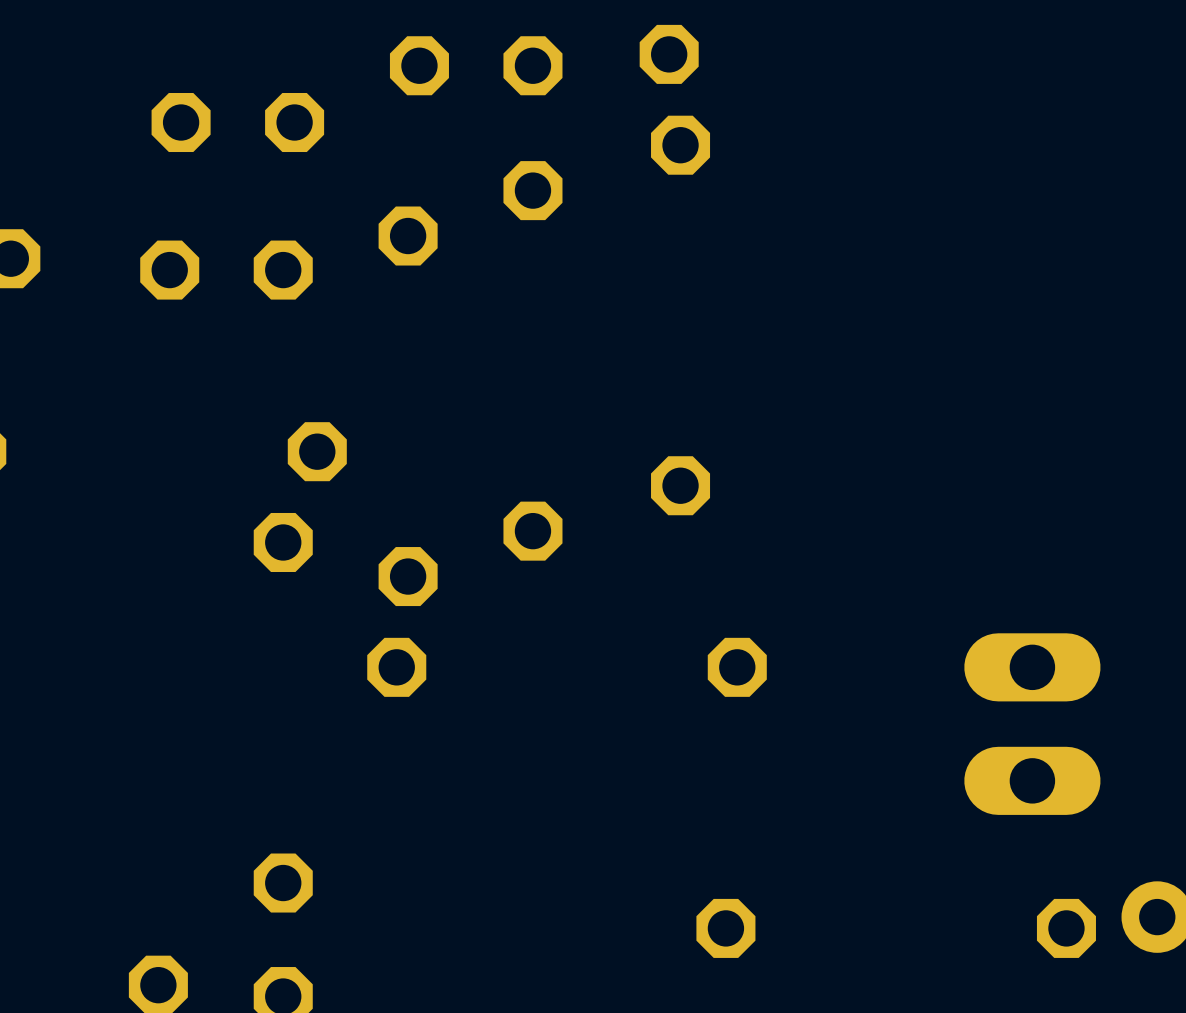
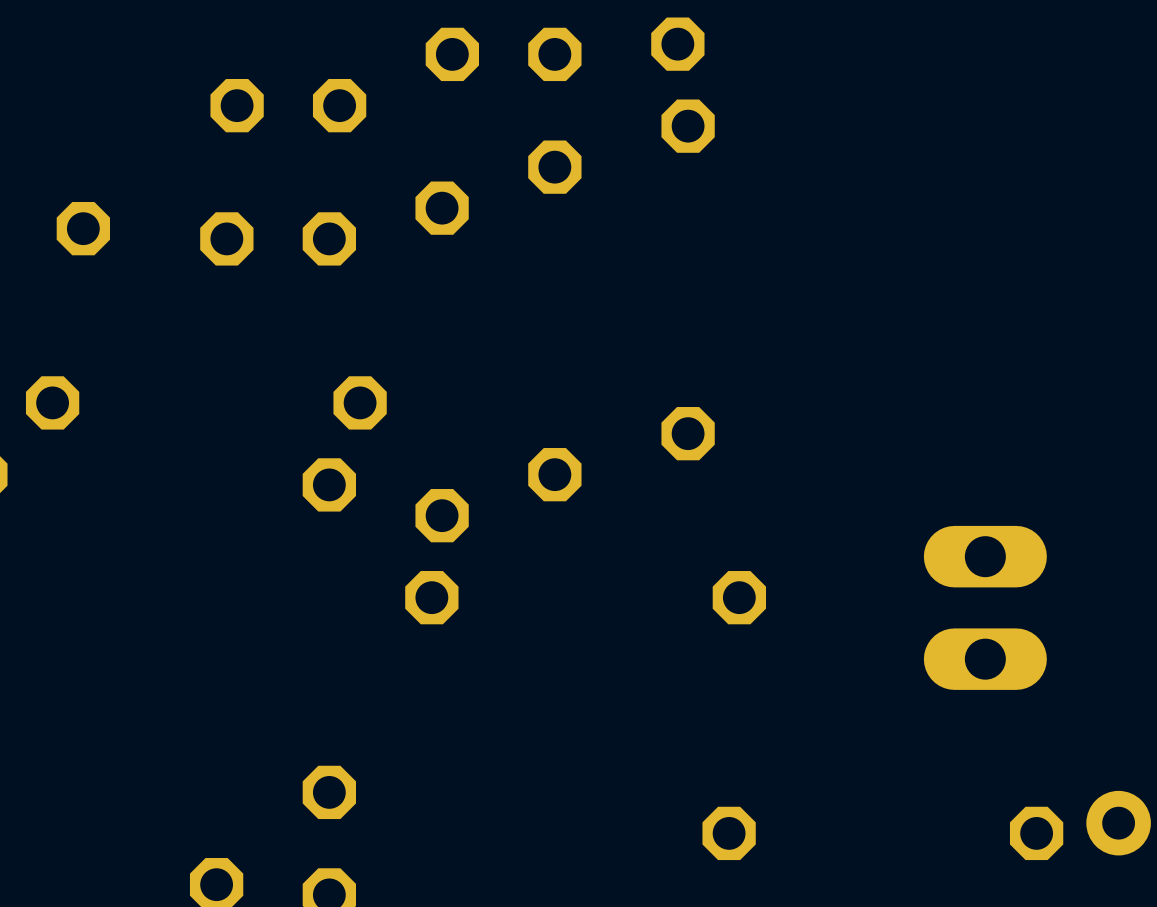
part position: (1032, 724) -> (985, 607)

